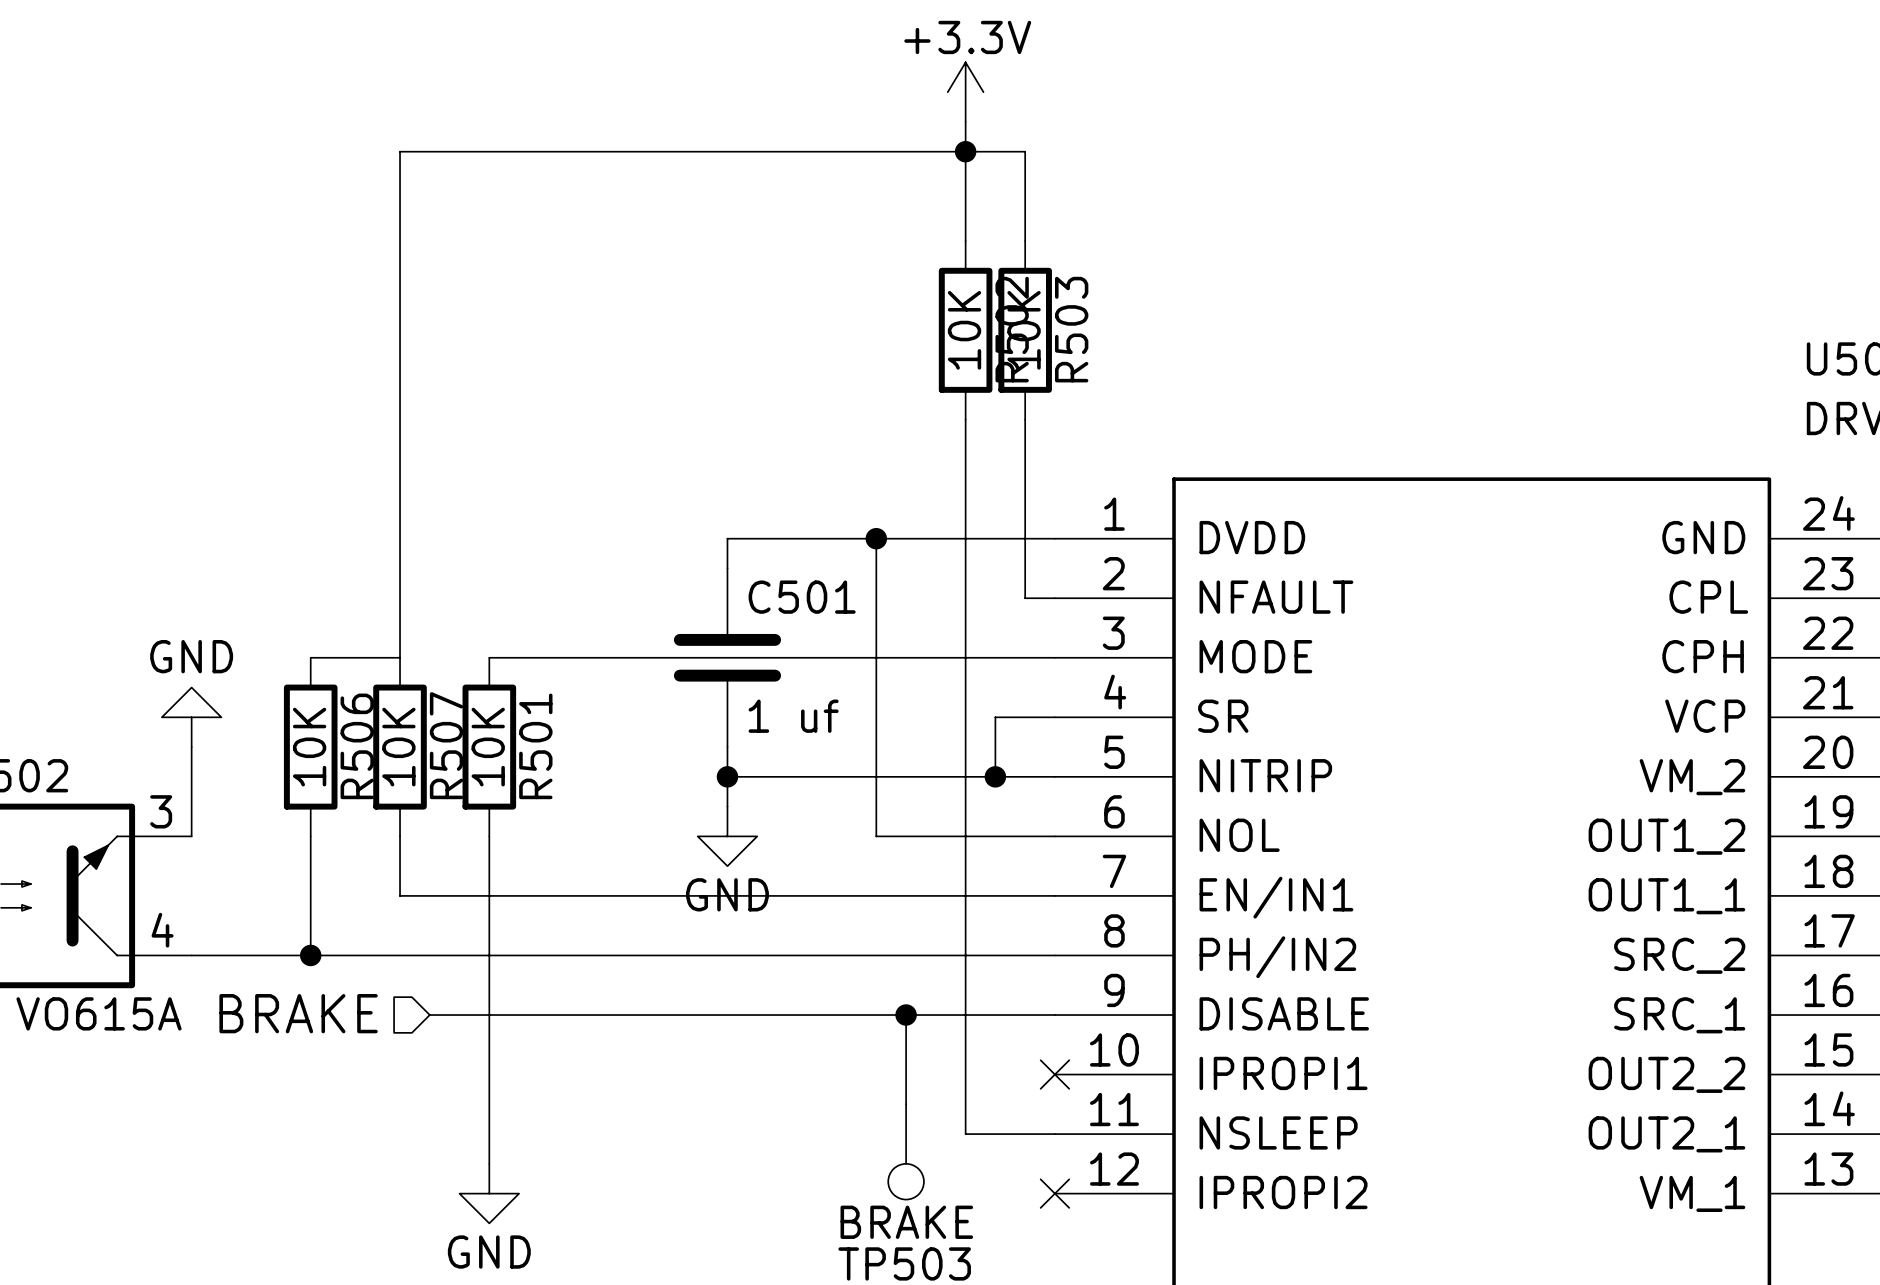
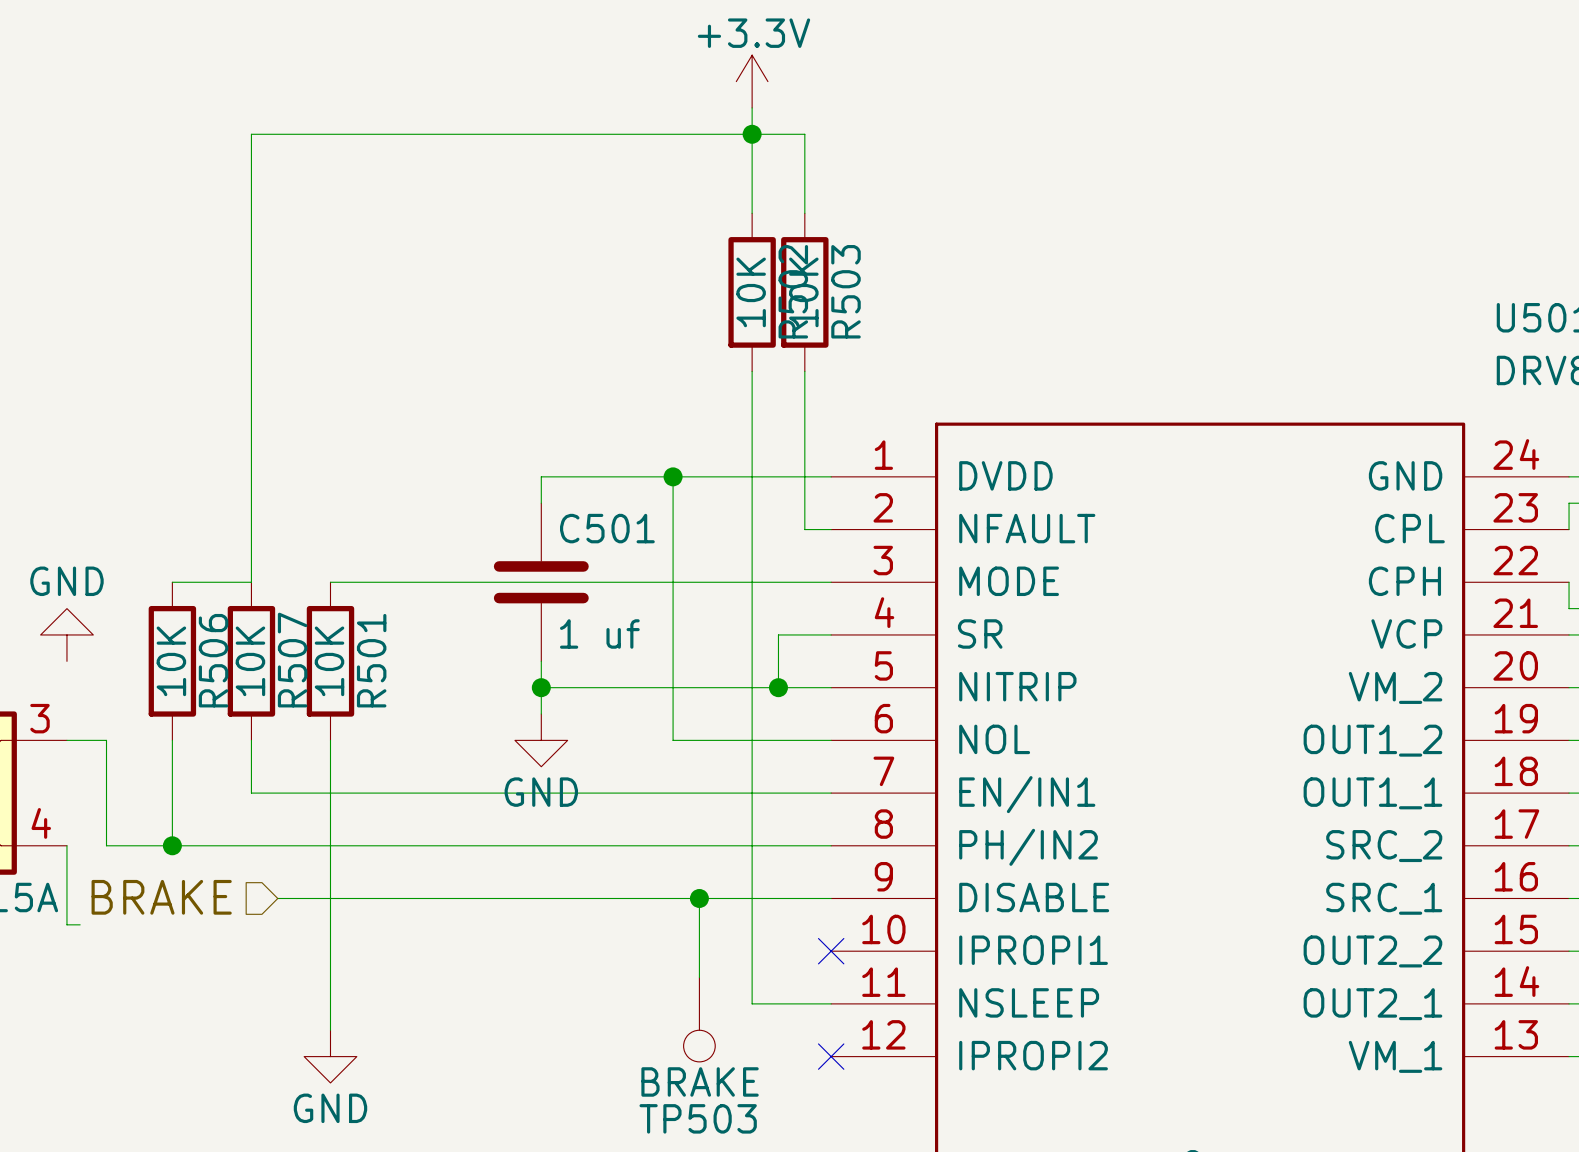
wire: (191, 747) (191, 836) -> (106, 845) (106, 740) (66, 740)
wire: (191, 955) (236, 955) -> (66, 845) (66, 924) (80, 924)

